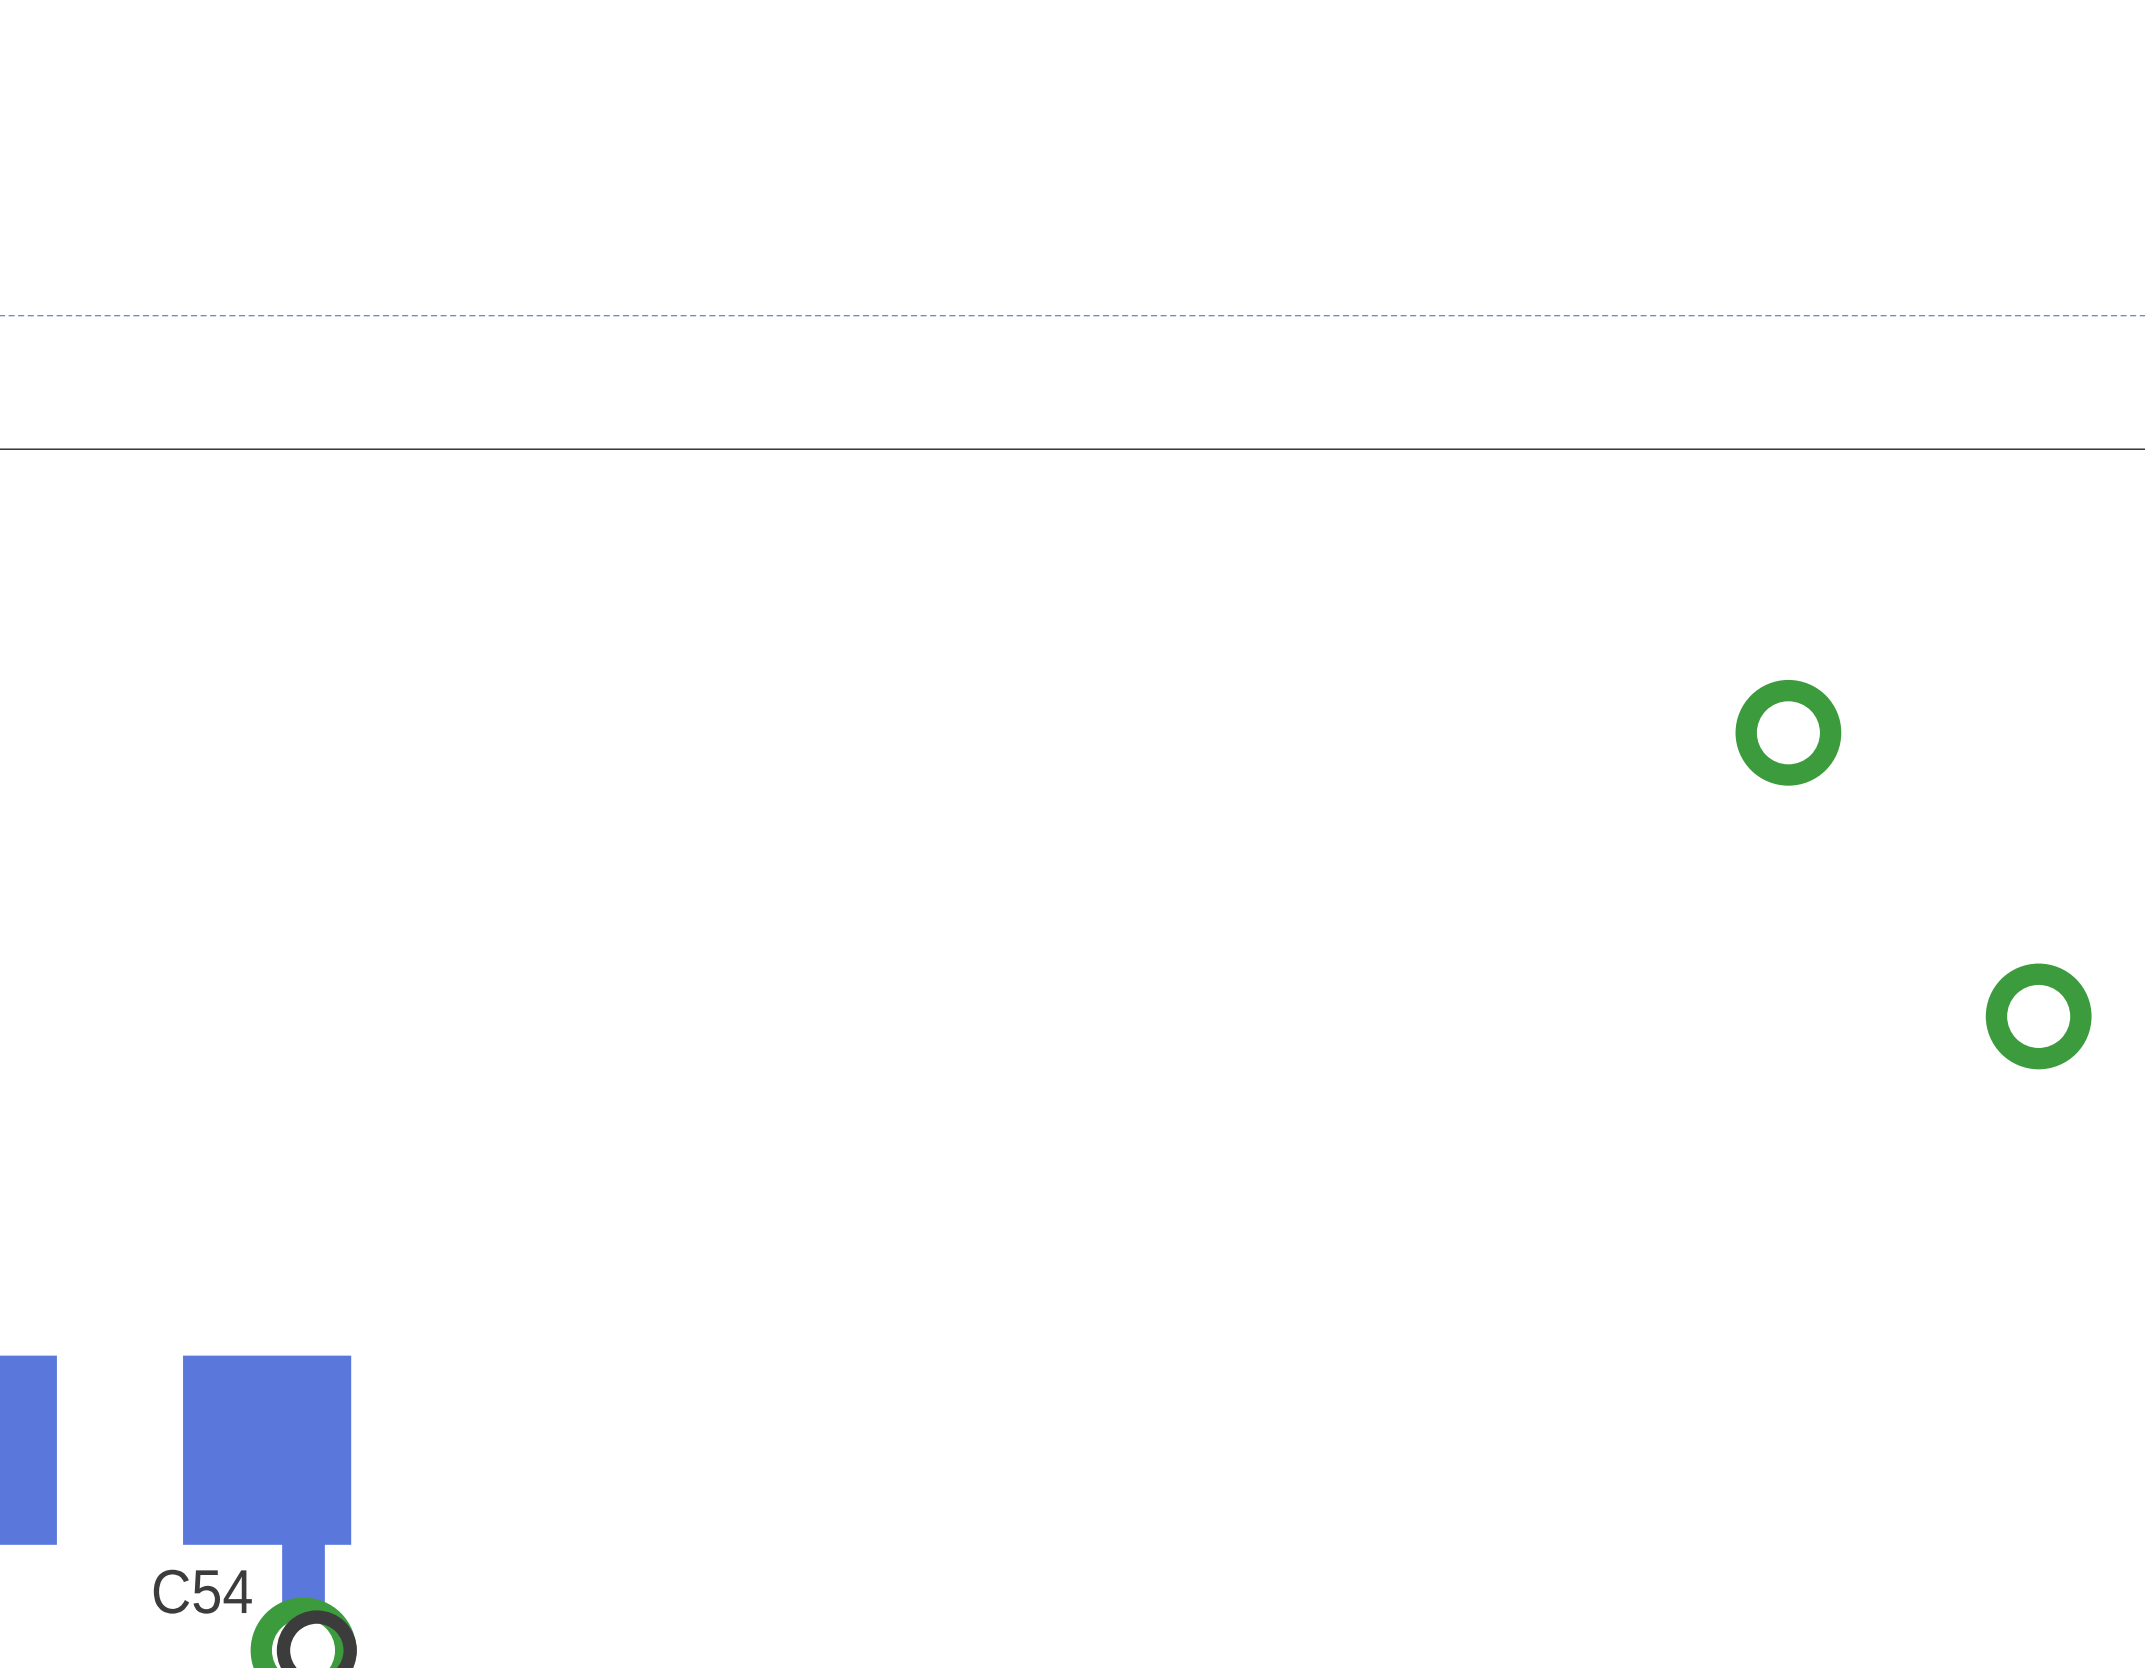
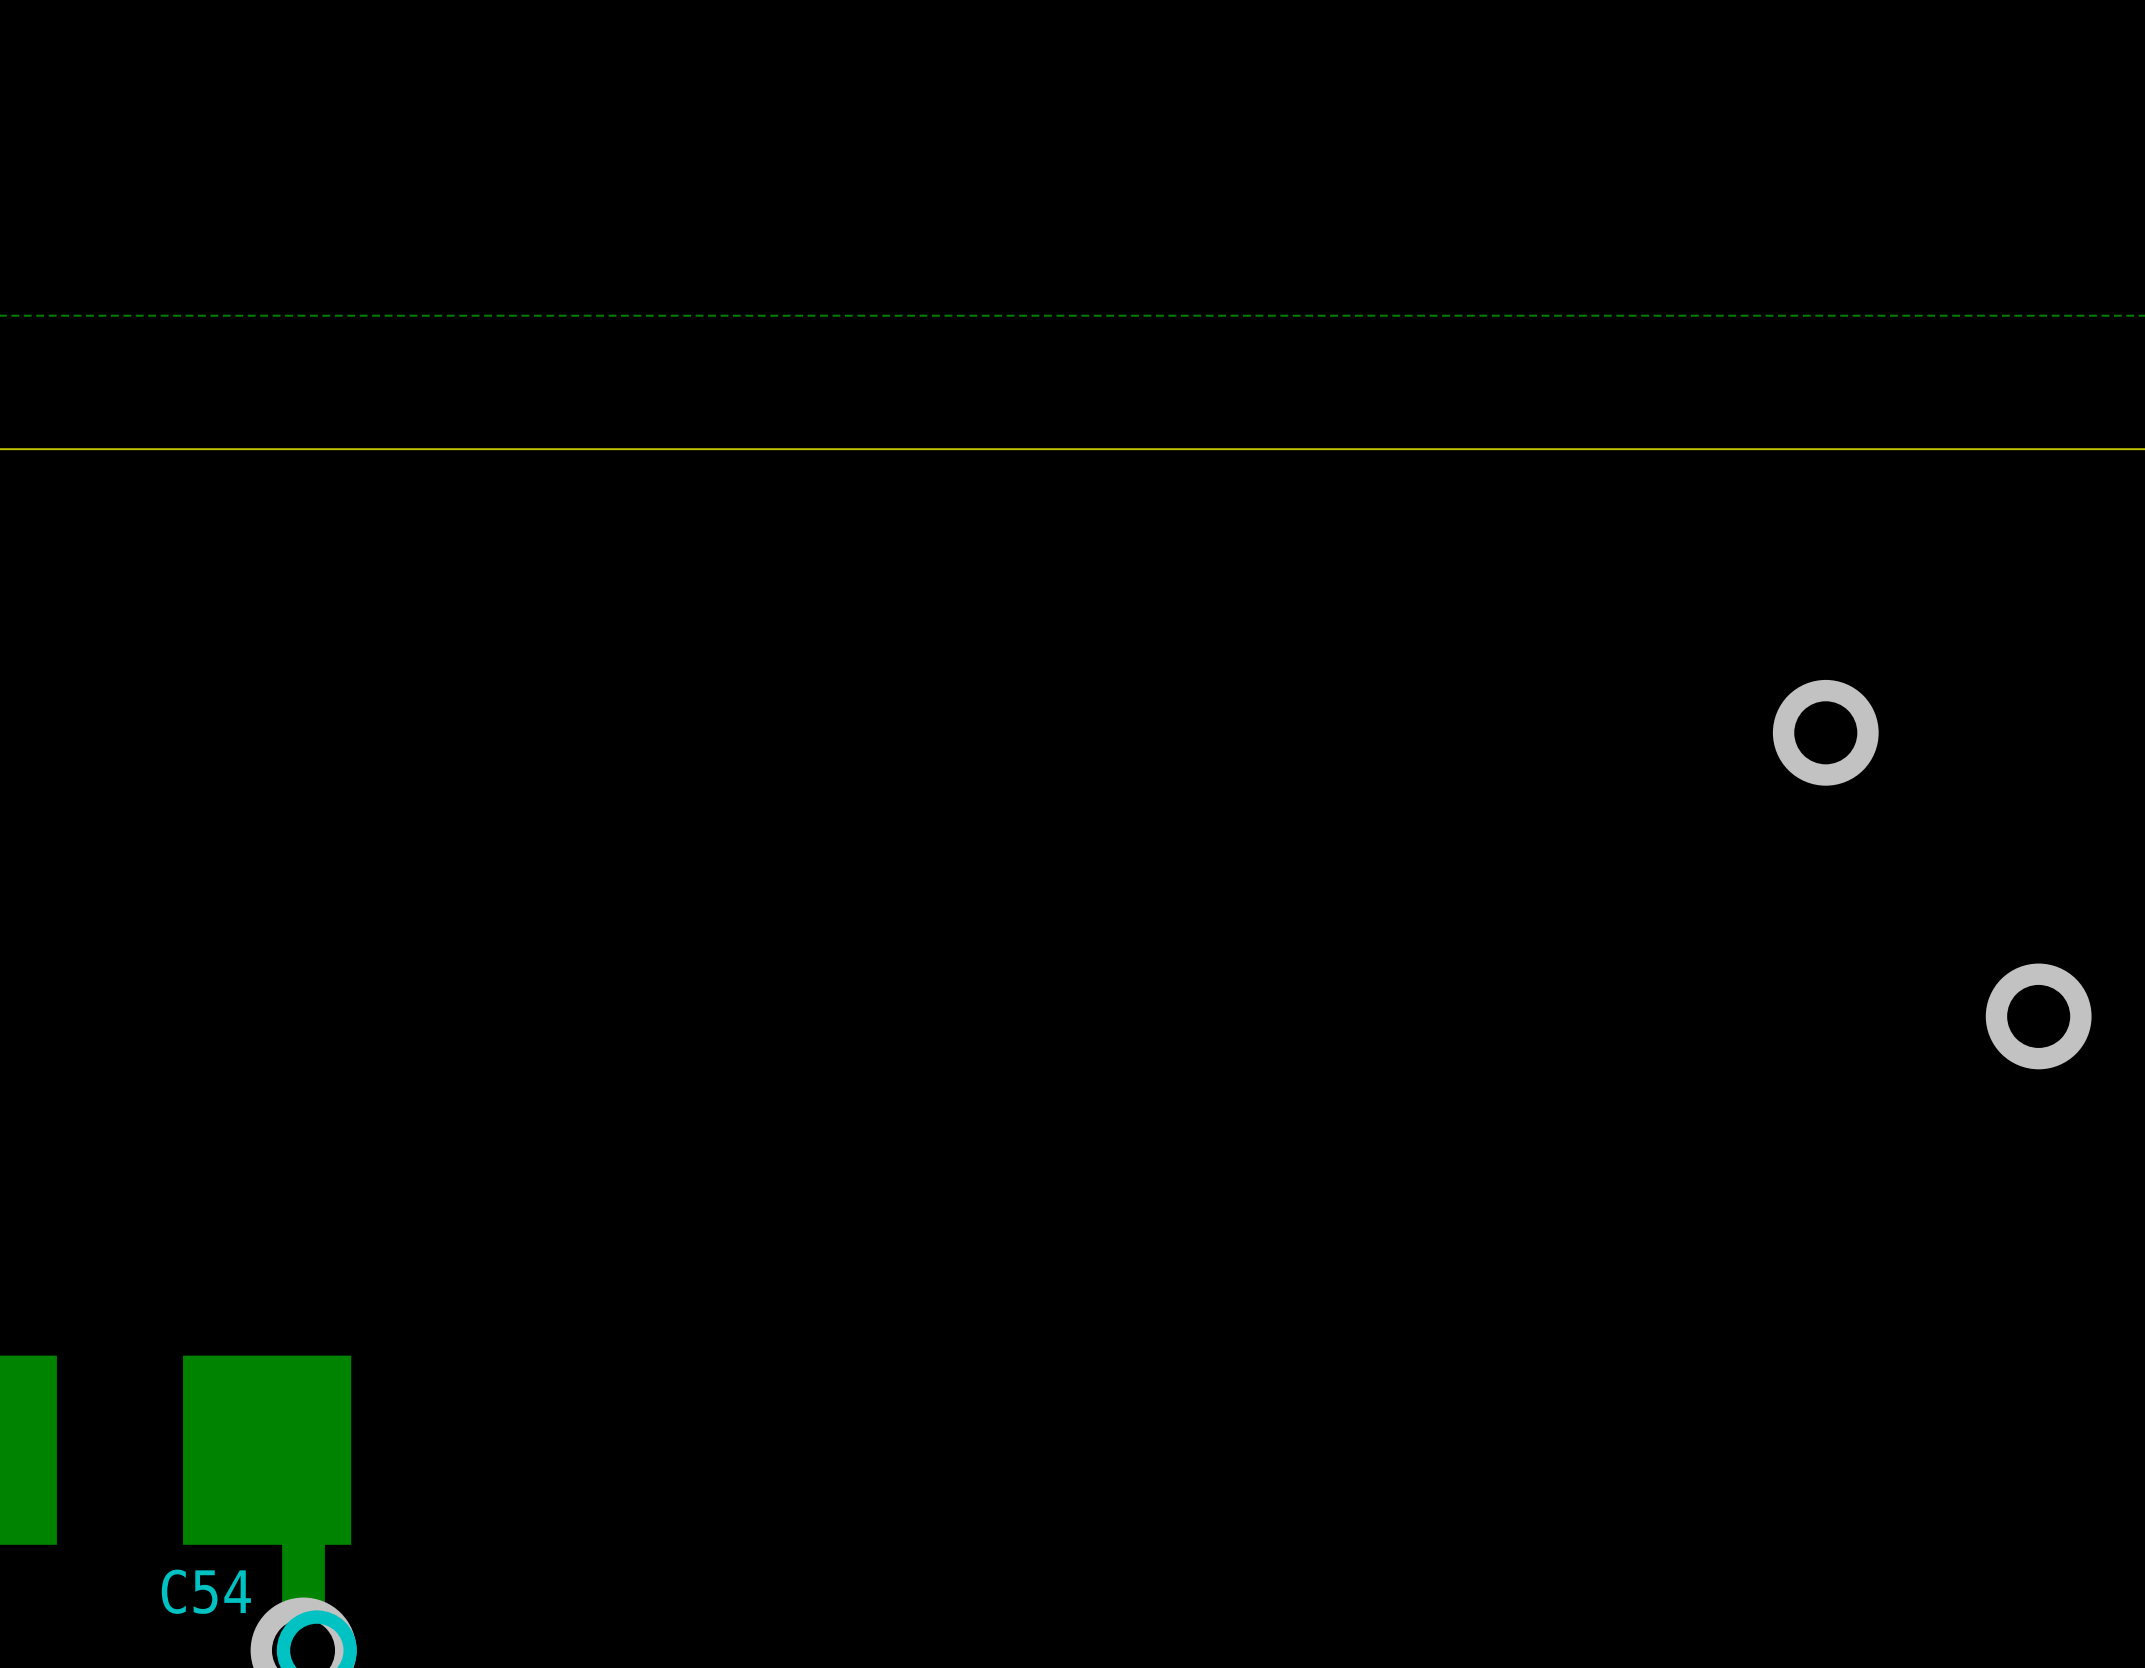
via position: (1788, 732) -> (1825, 732)

